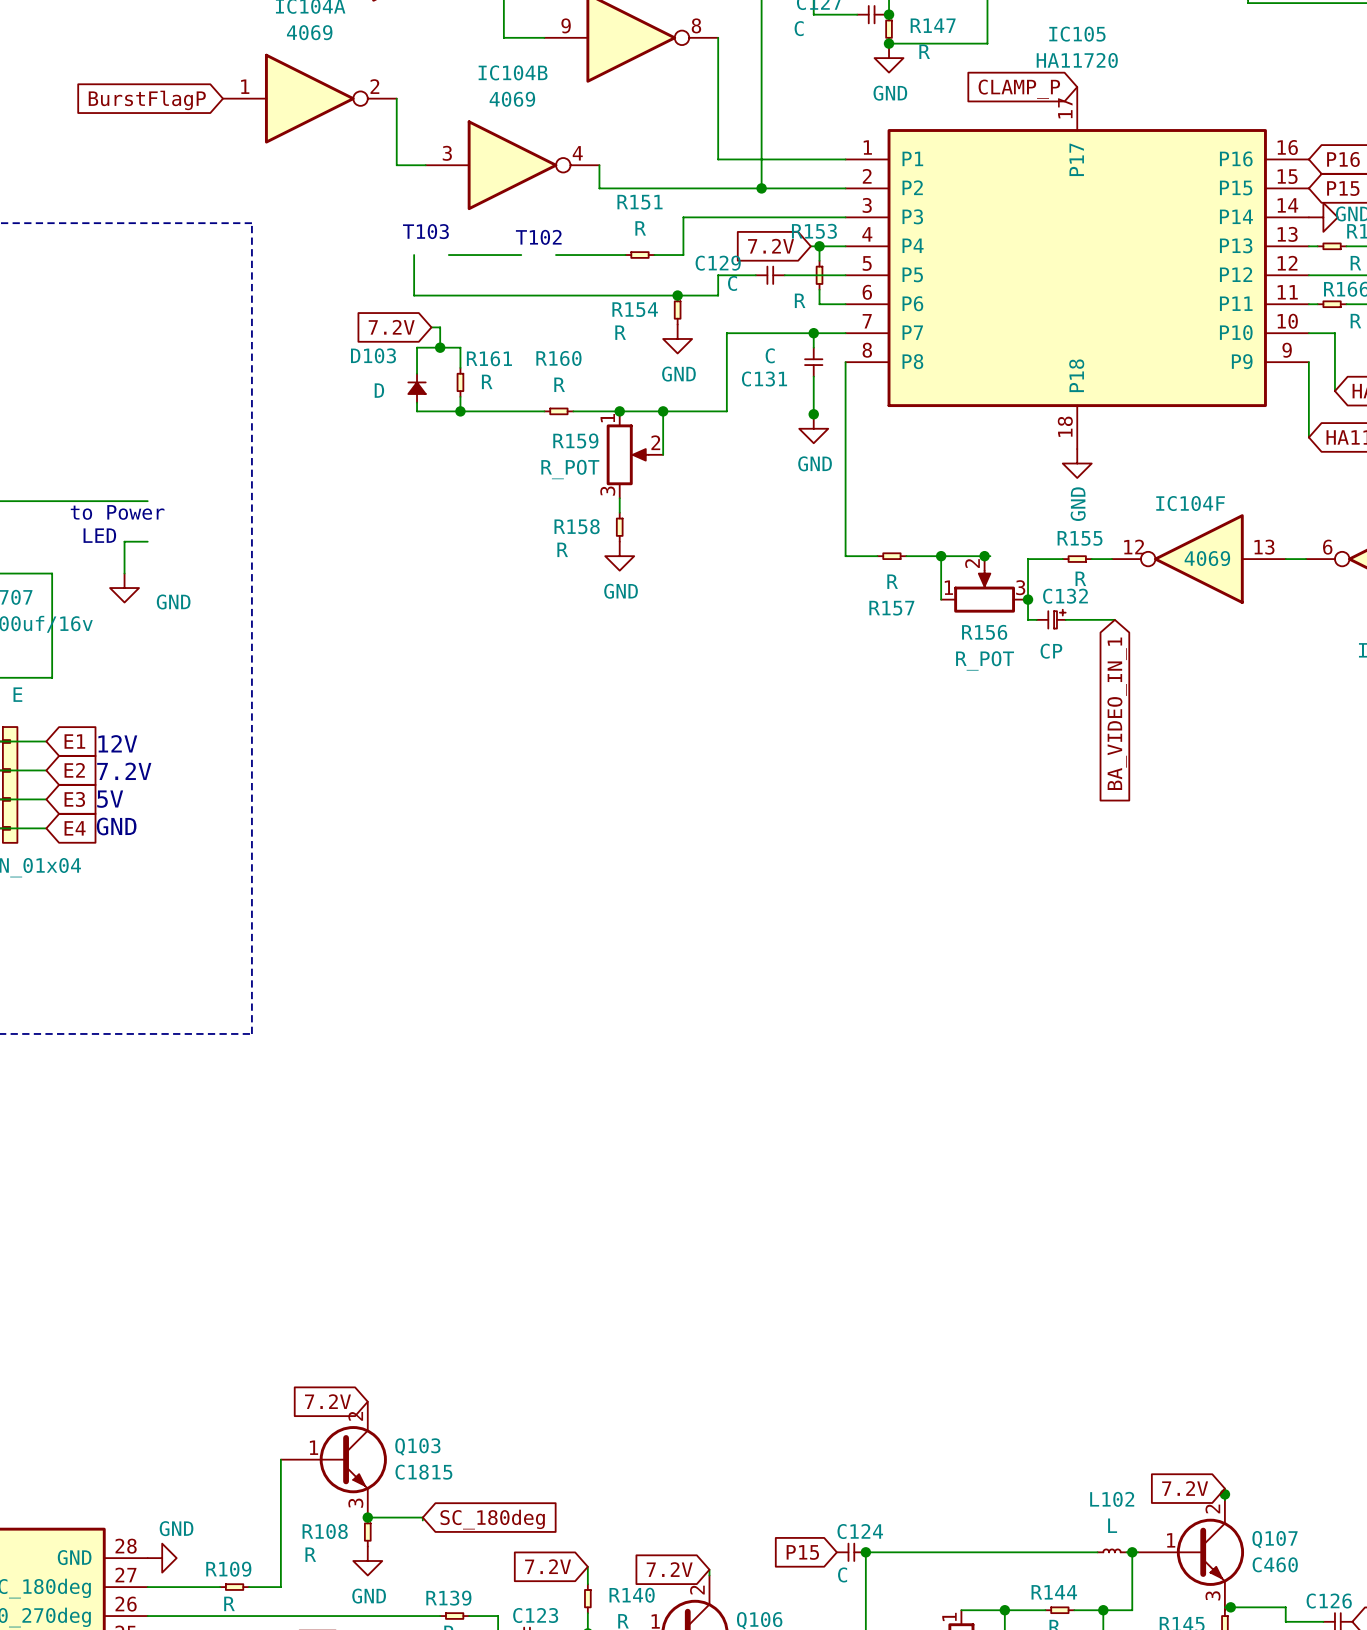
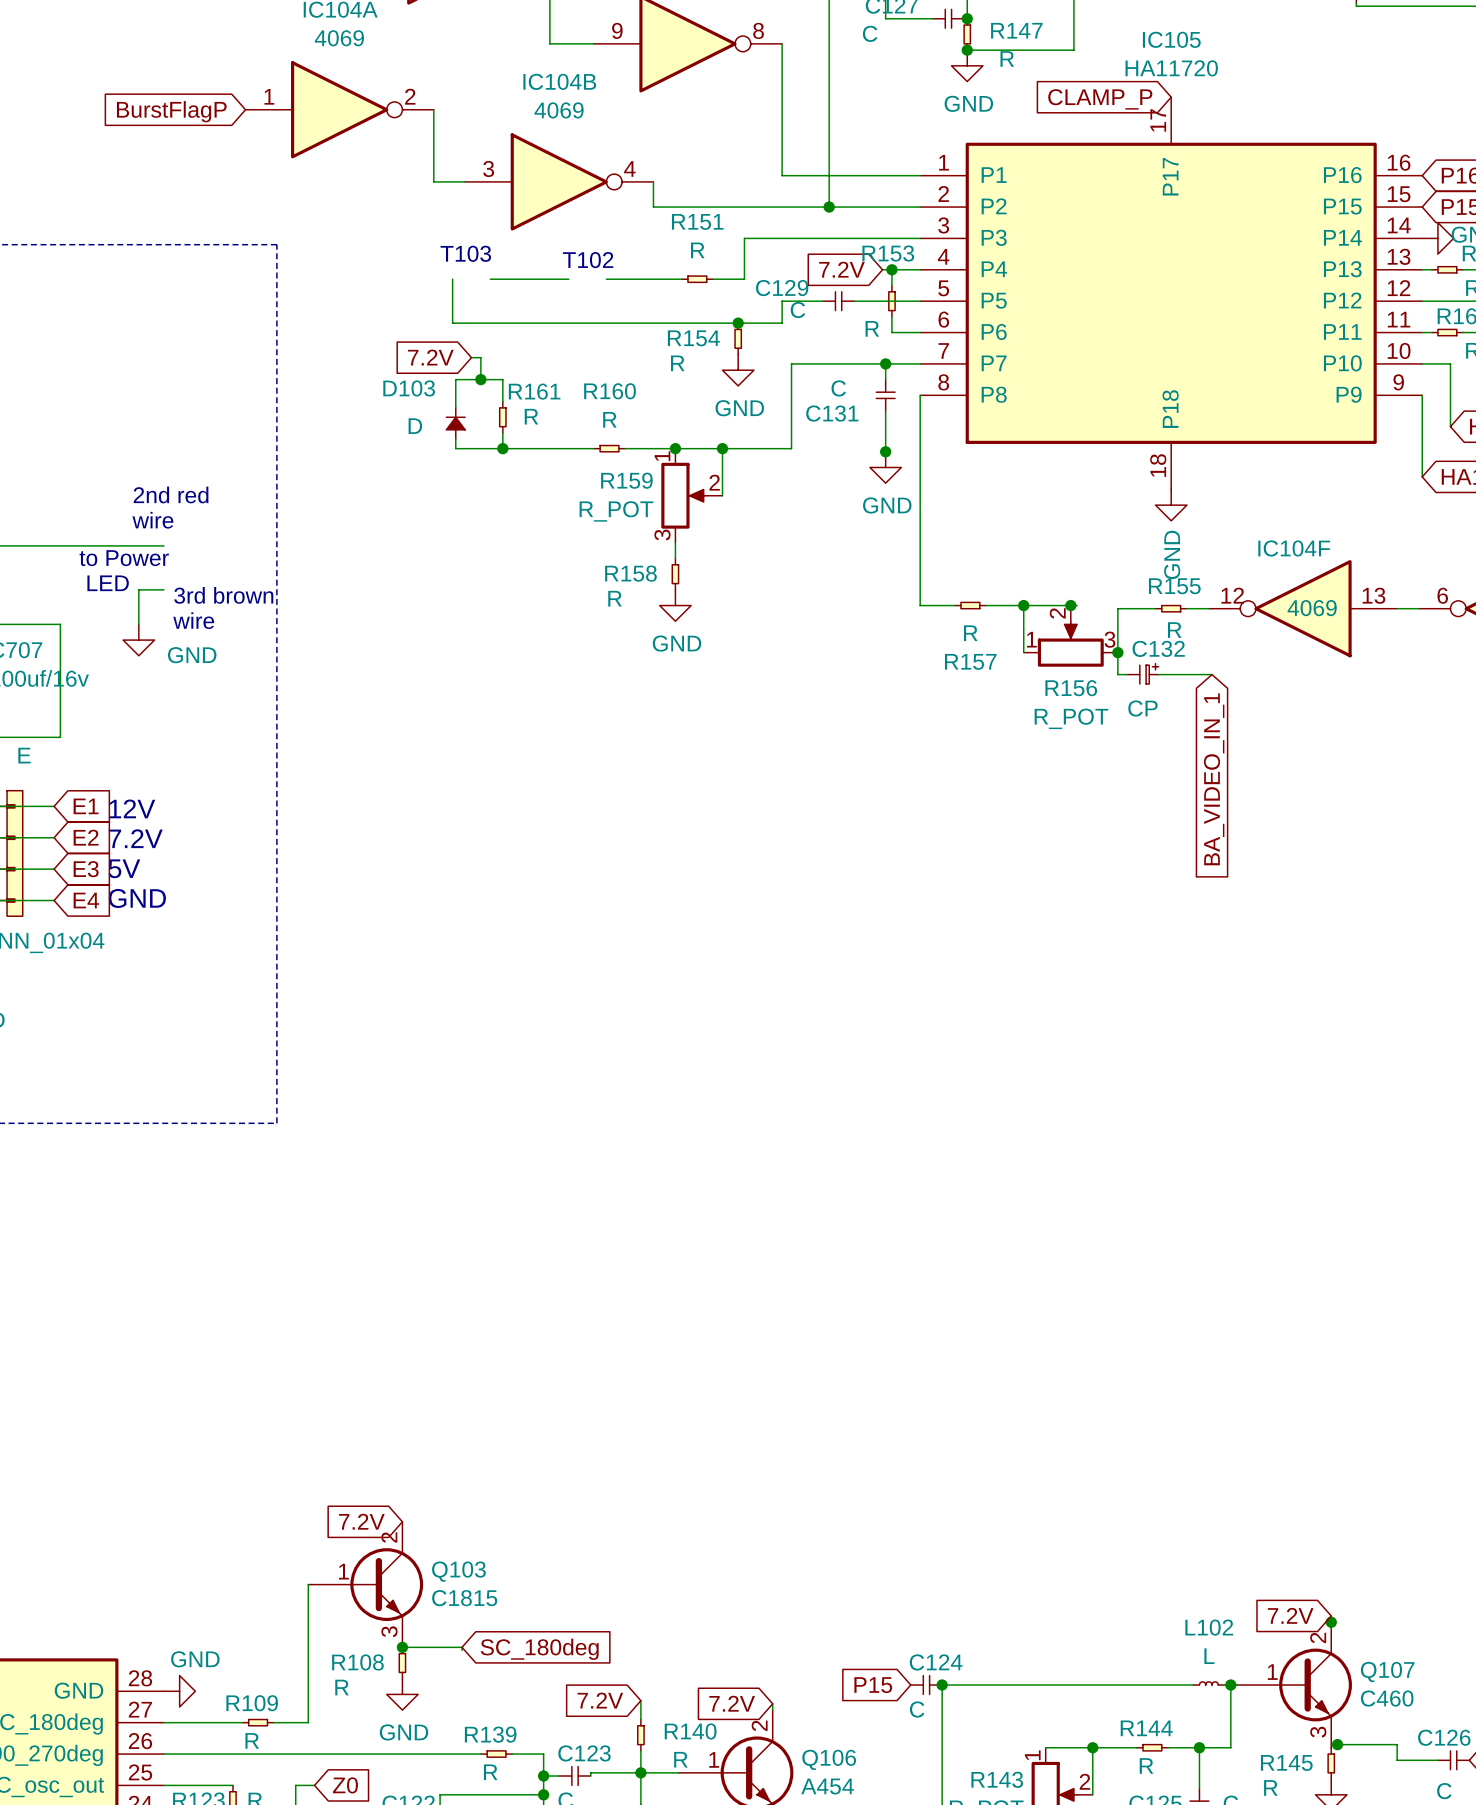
text: none -> 2nd red (171, 494)
text: none -> wire (152, 520)
text: none -> 3rd brown (223, 595)
text: none -> wire (193, 620)

